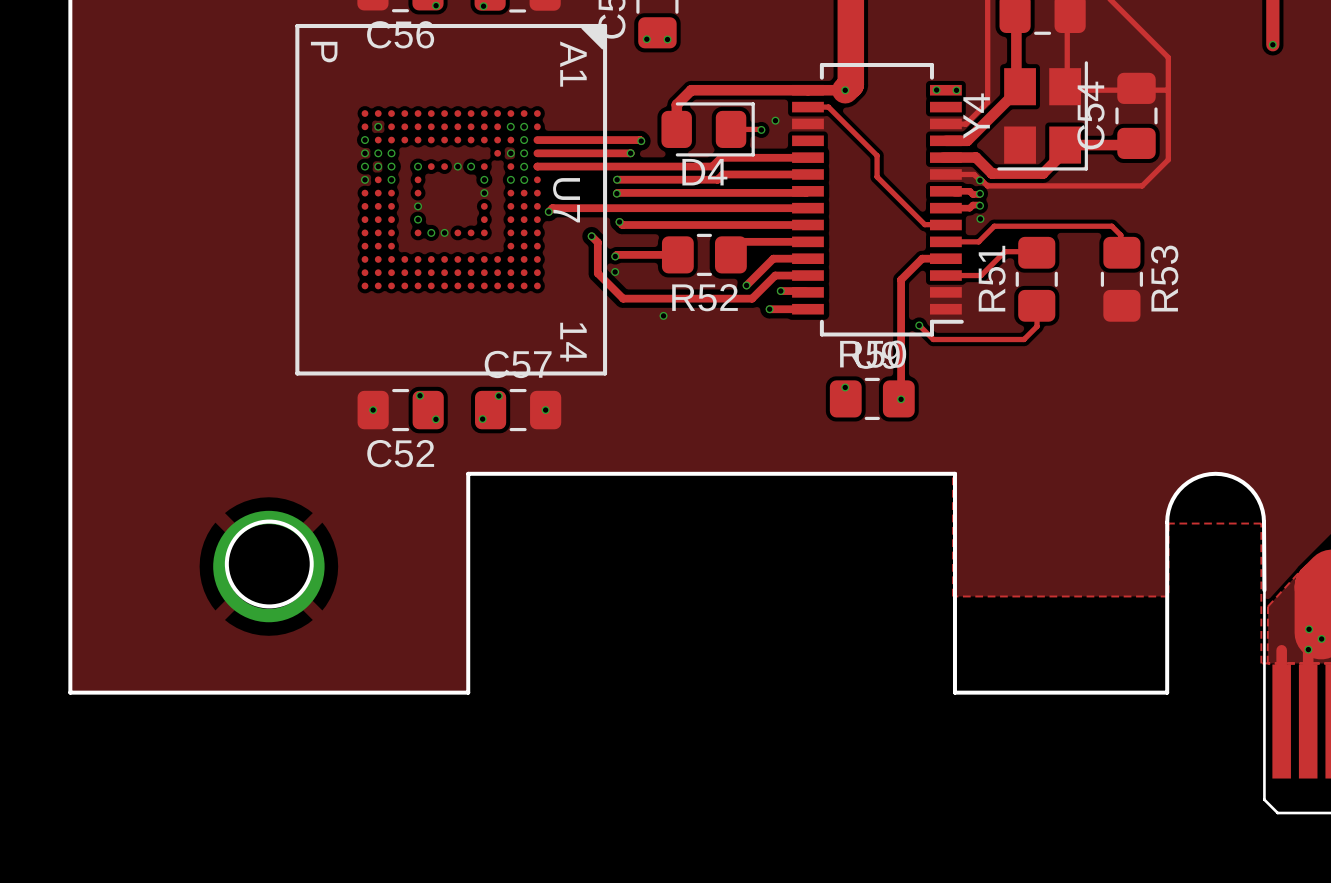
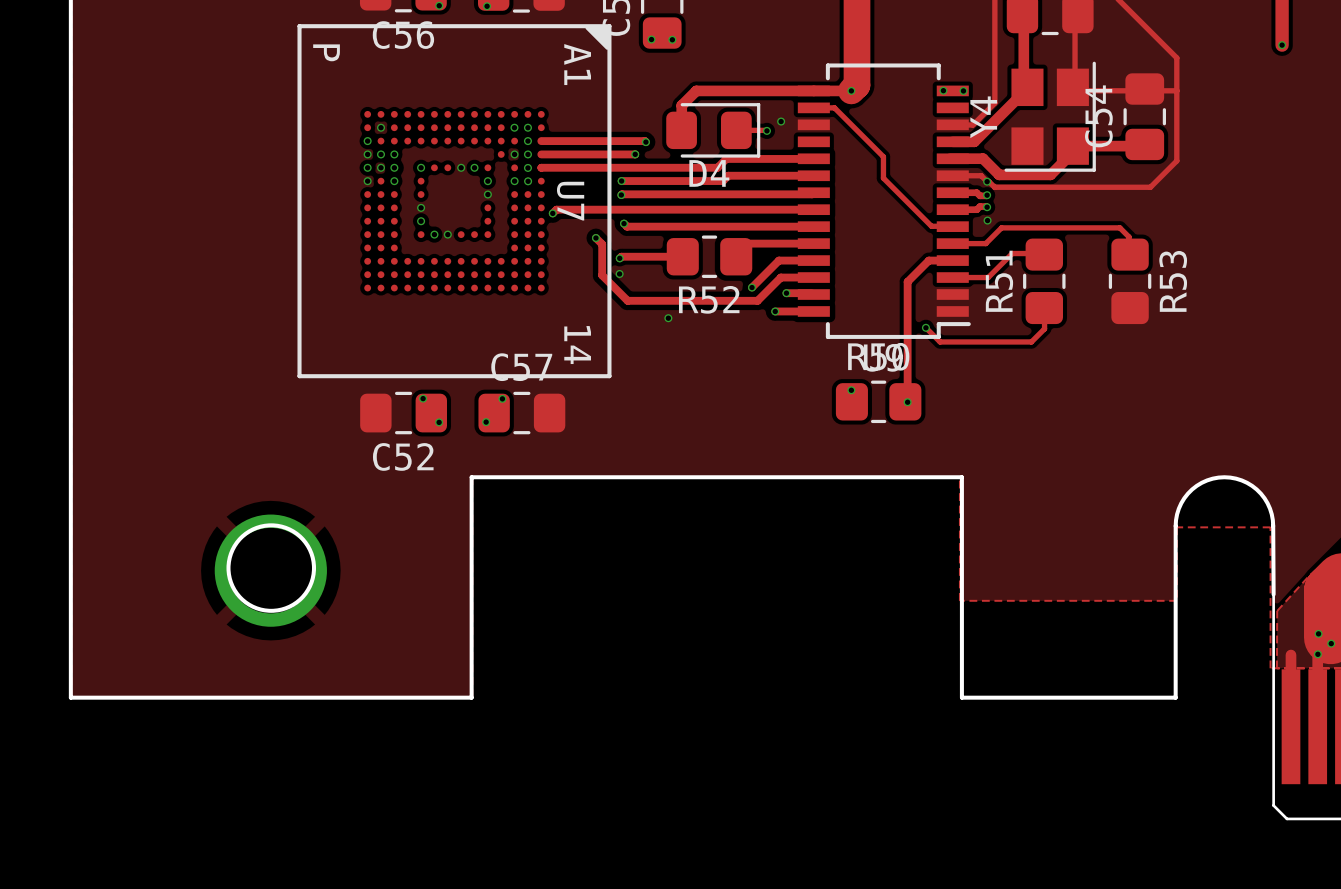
via: (373, 410) -> none
via: (545, 410) -> none

